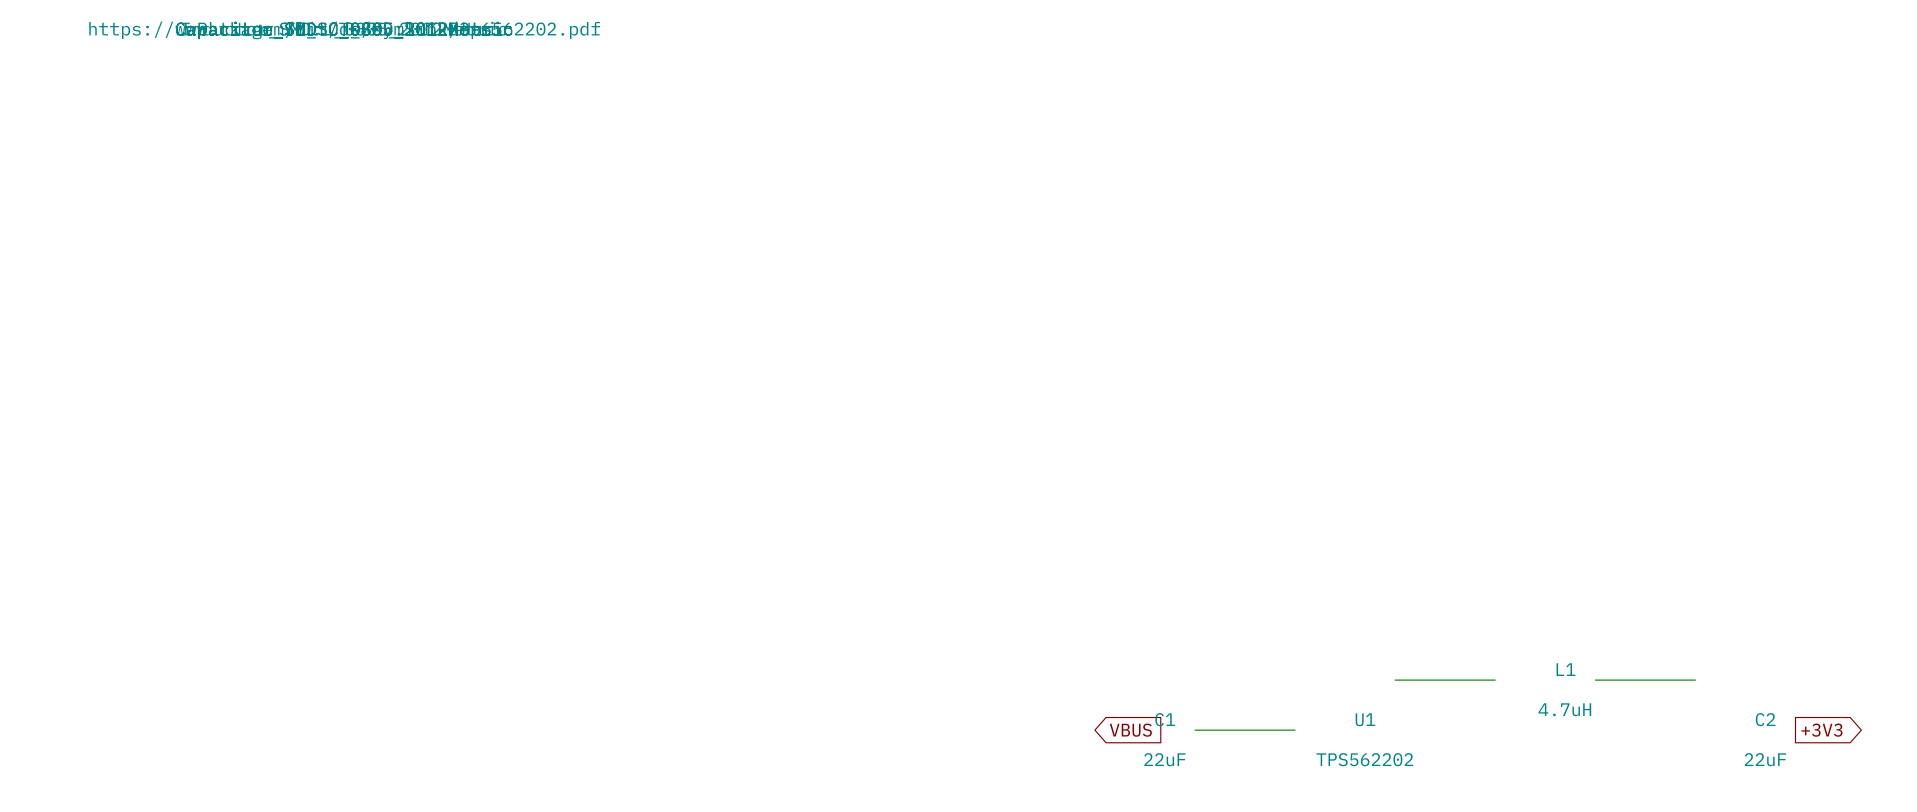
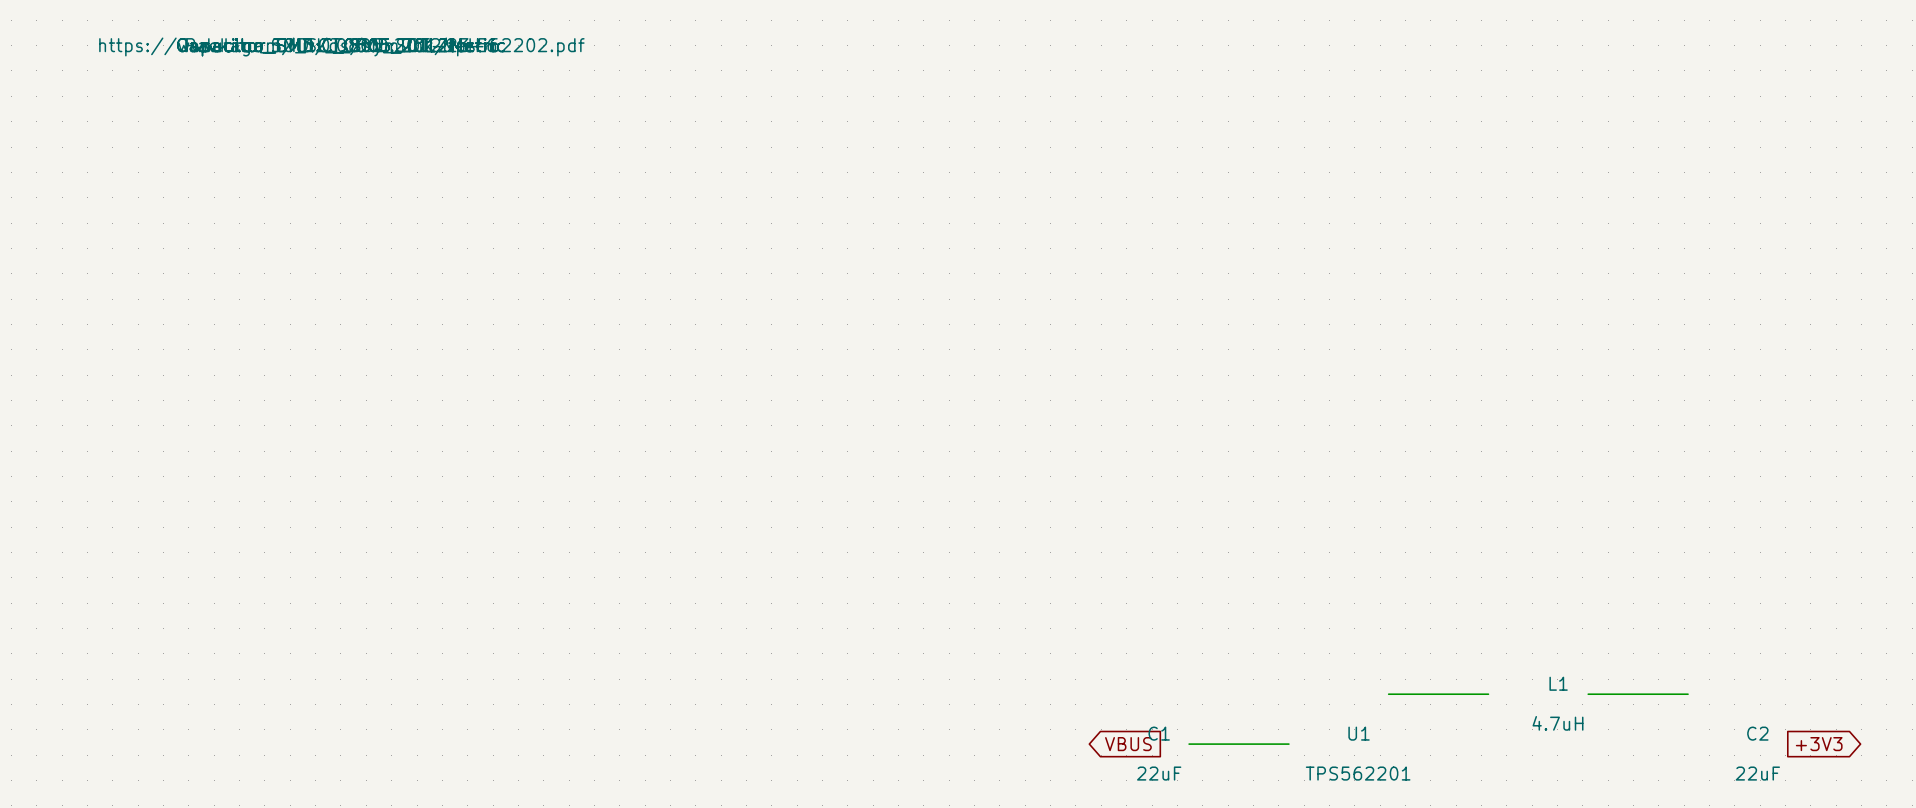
U1 value: TPS562202 (1364, 759) -> TPS562201 (1358, 773)

